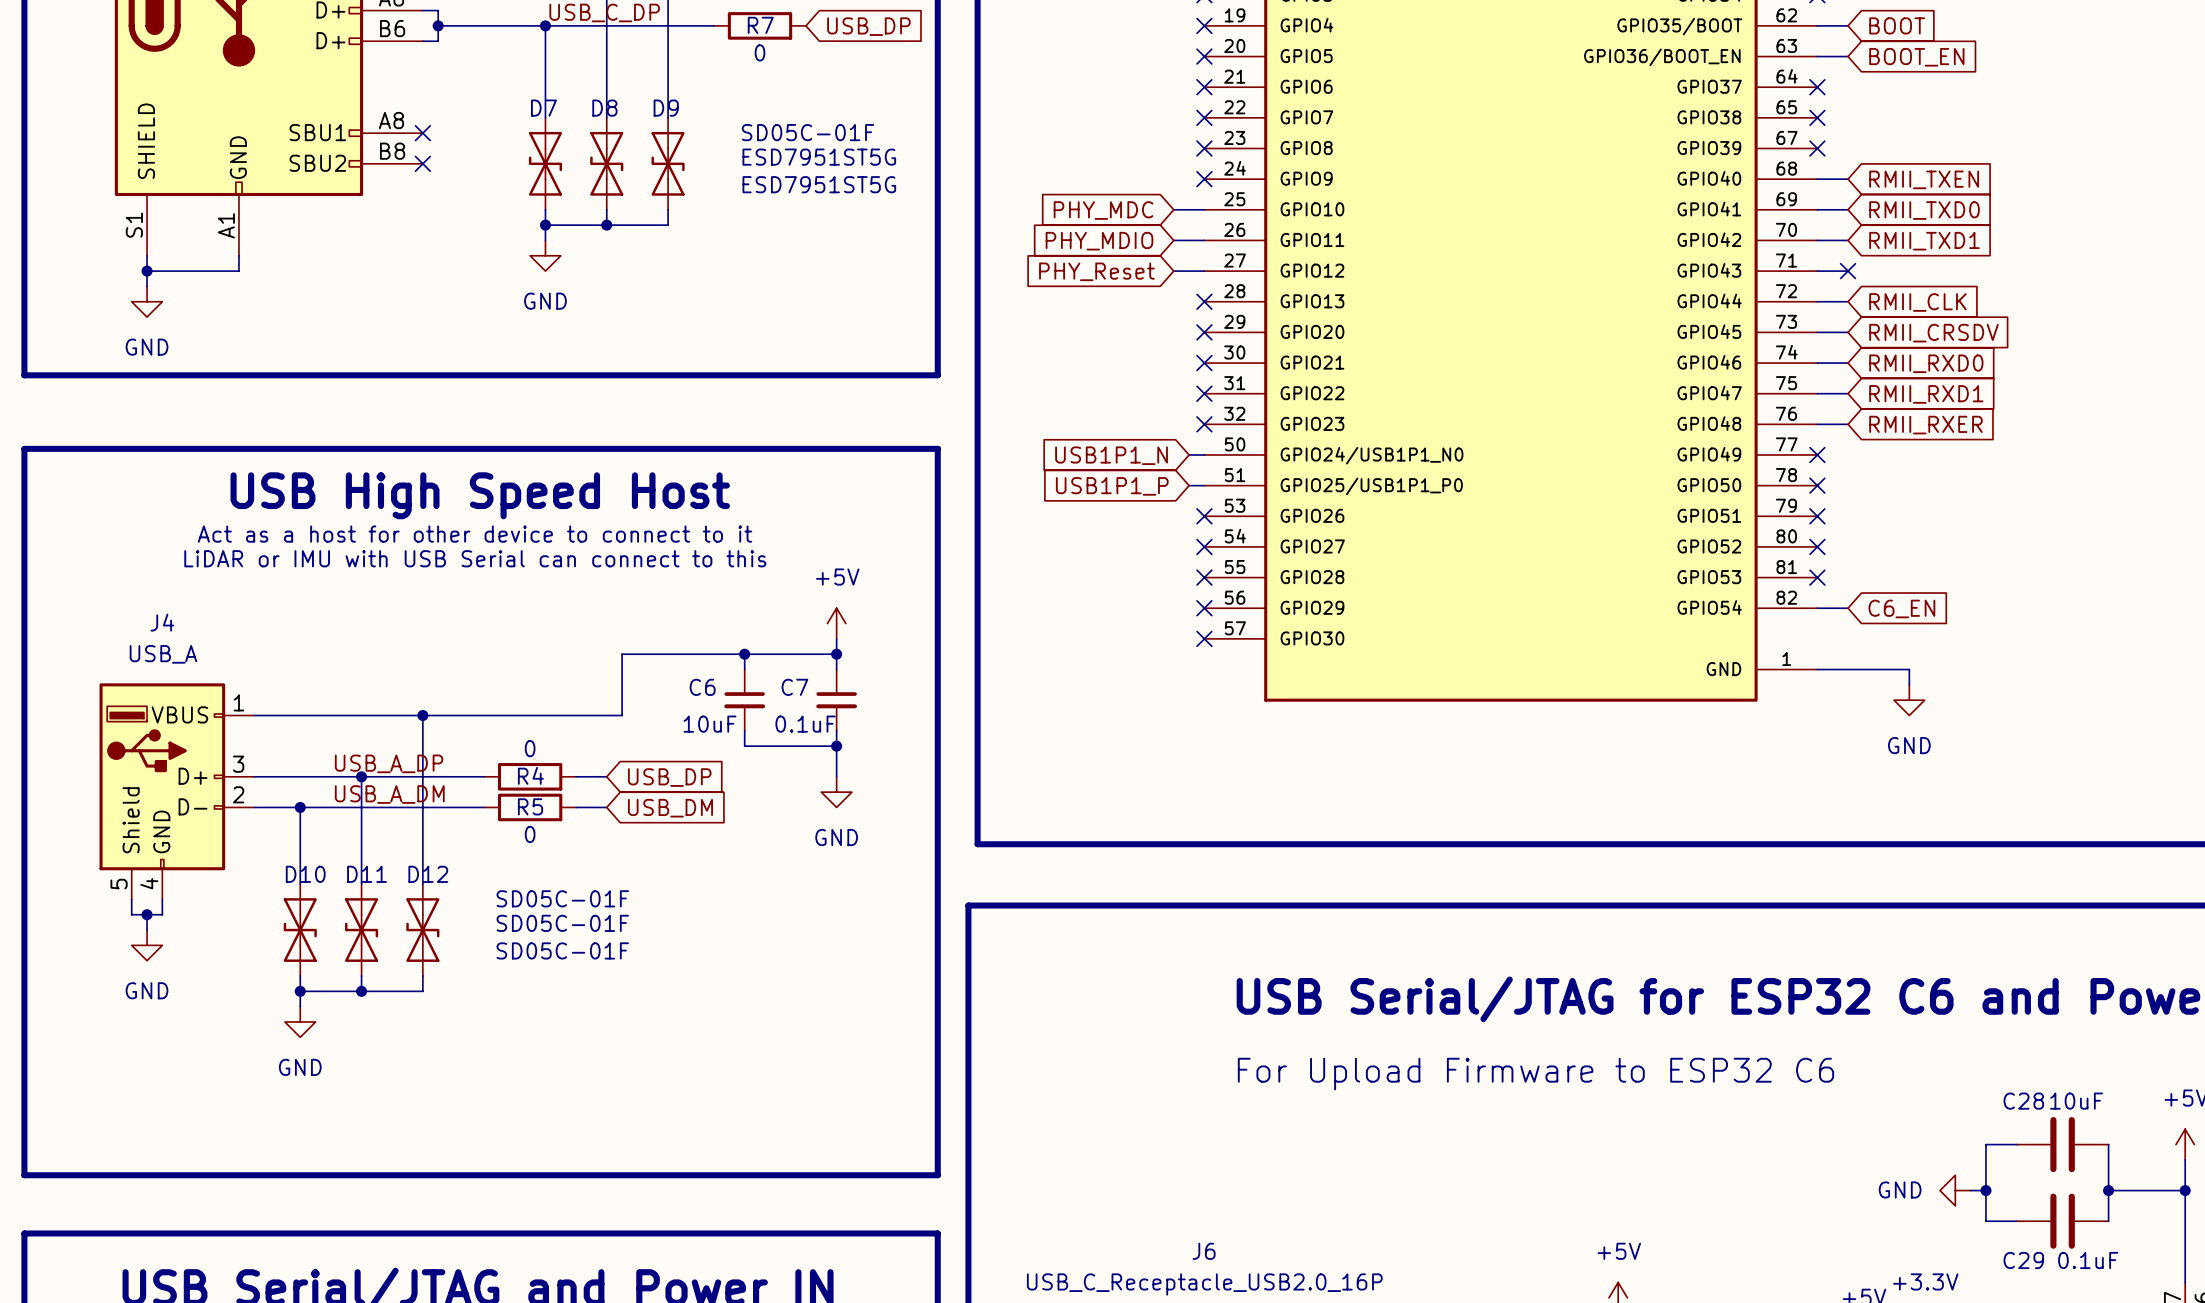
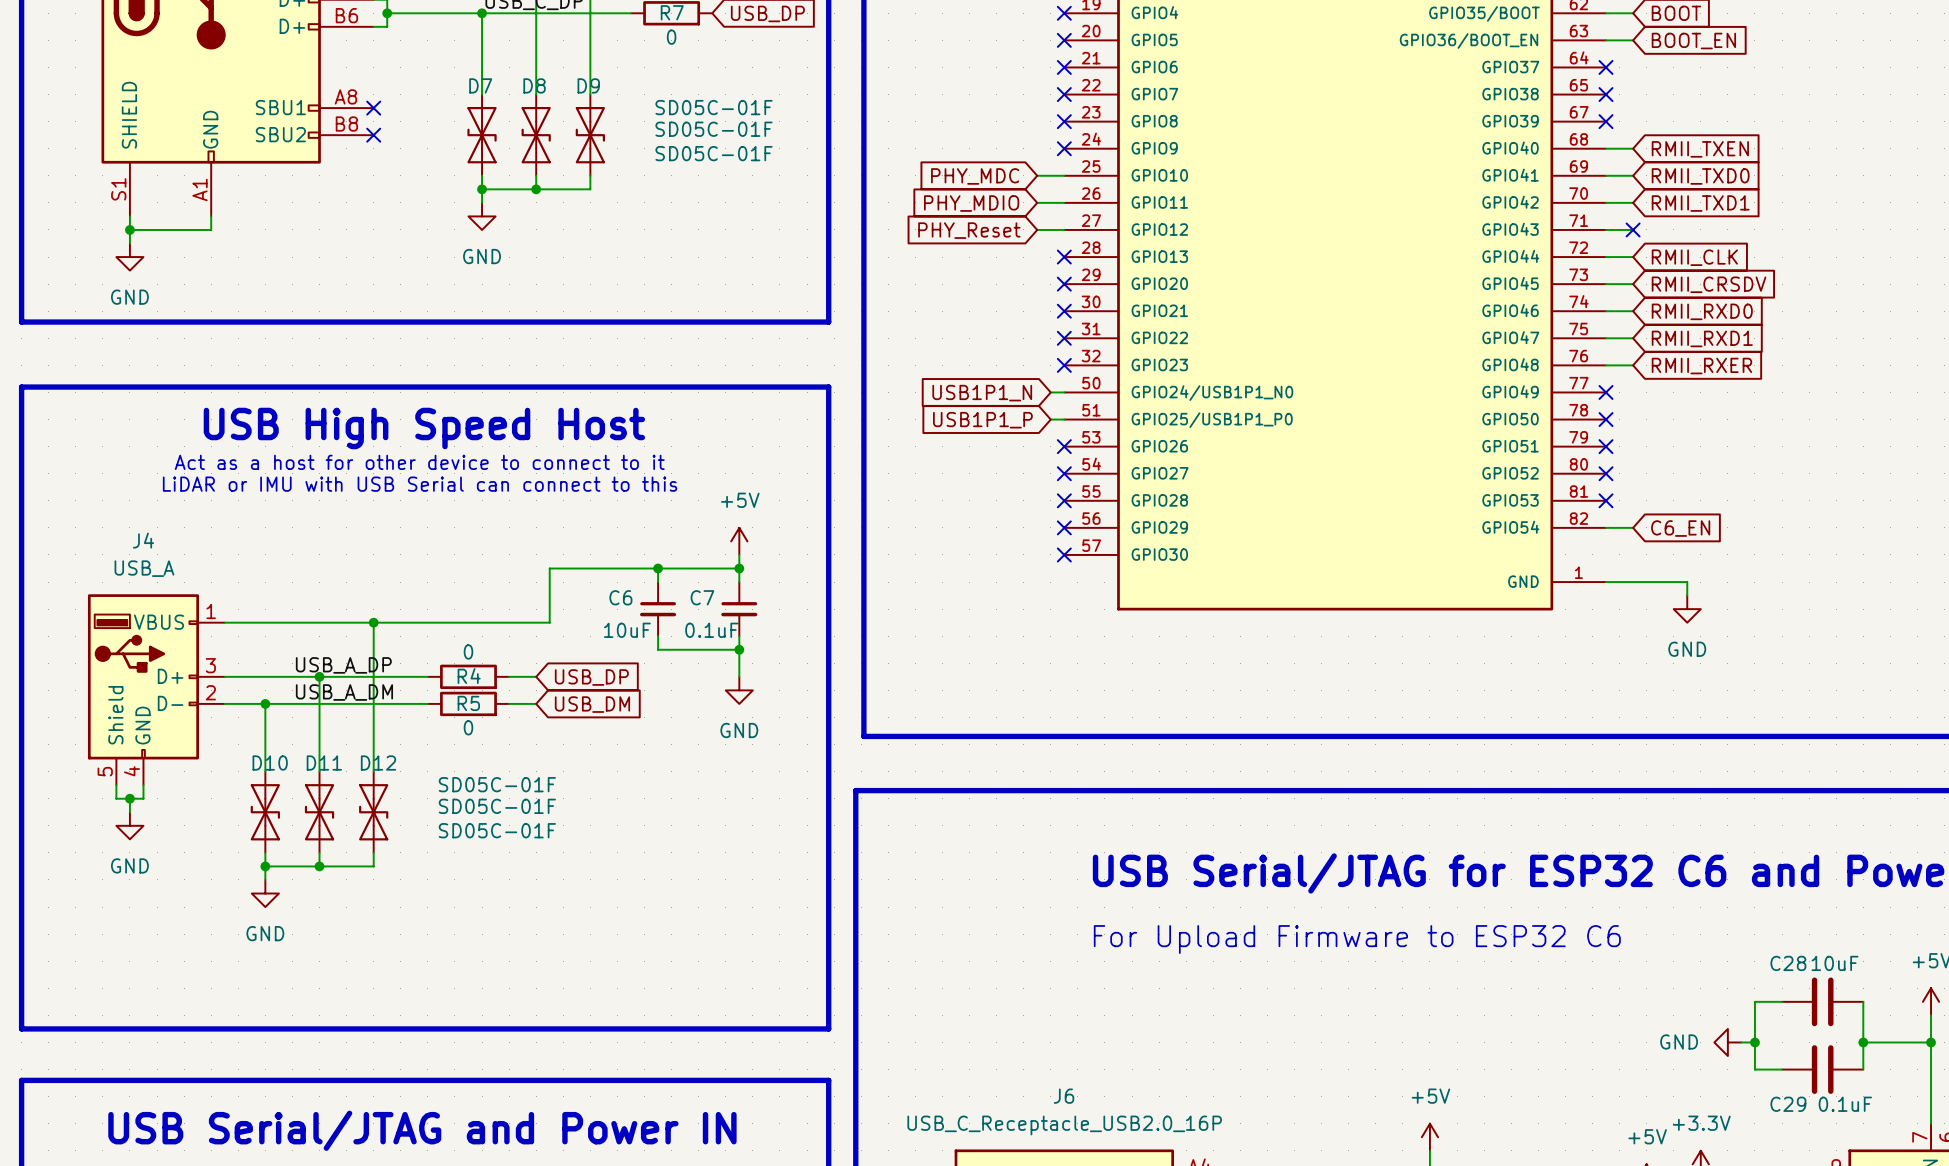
D8 value: ESD7951ST5G (819, 157) -> SD05C-01F (714, 129)
D7 value: ESD7951ST5G (819, 184) -> SD05C-01F (714, 153)

